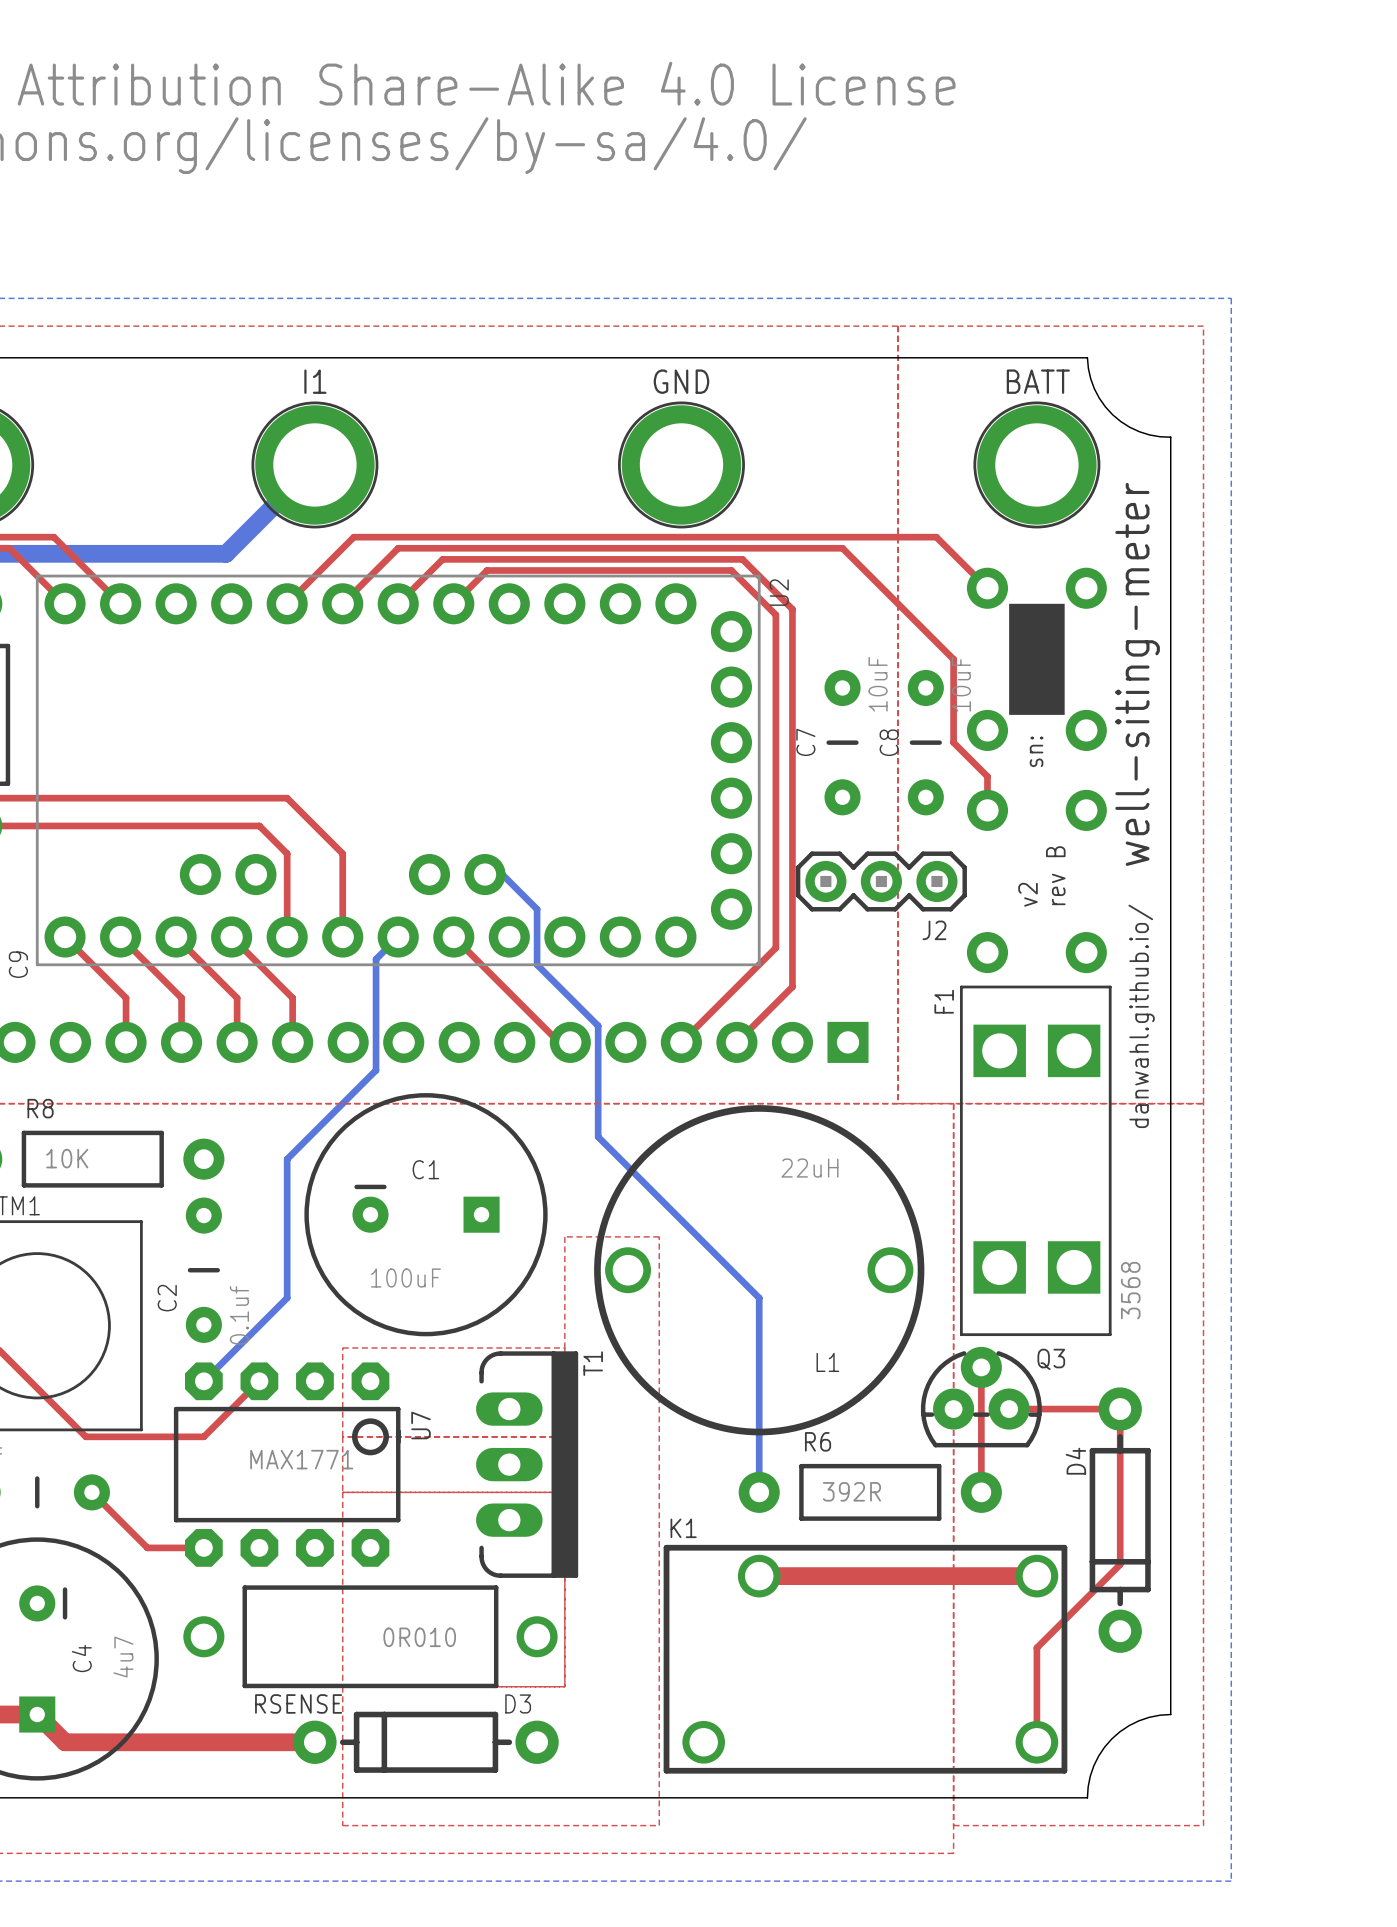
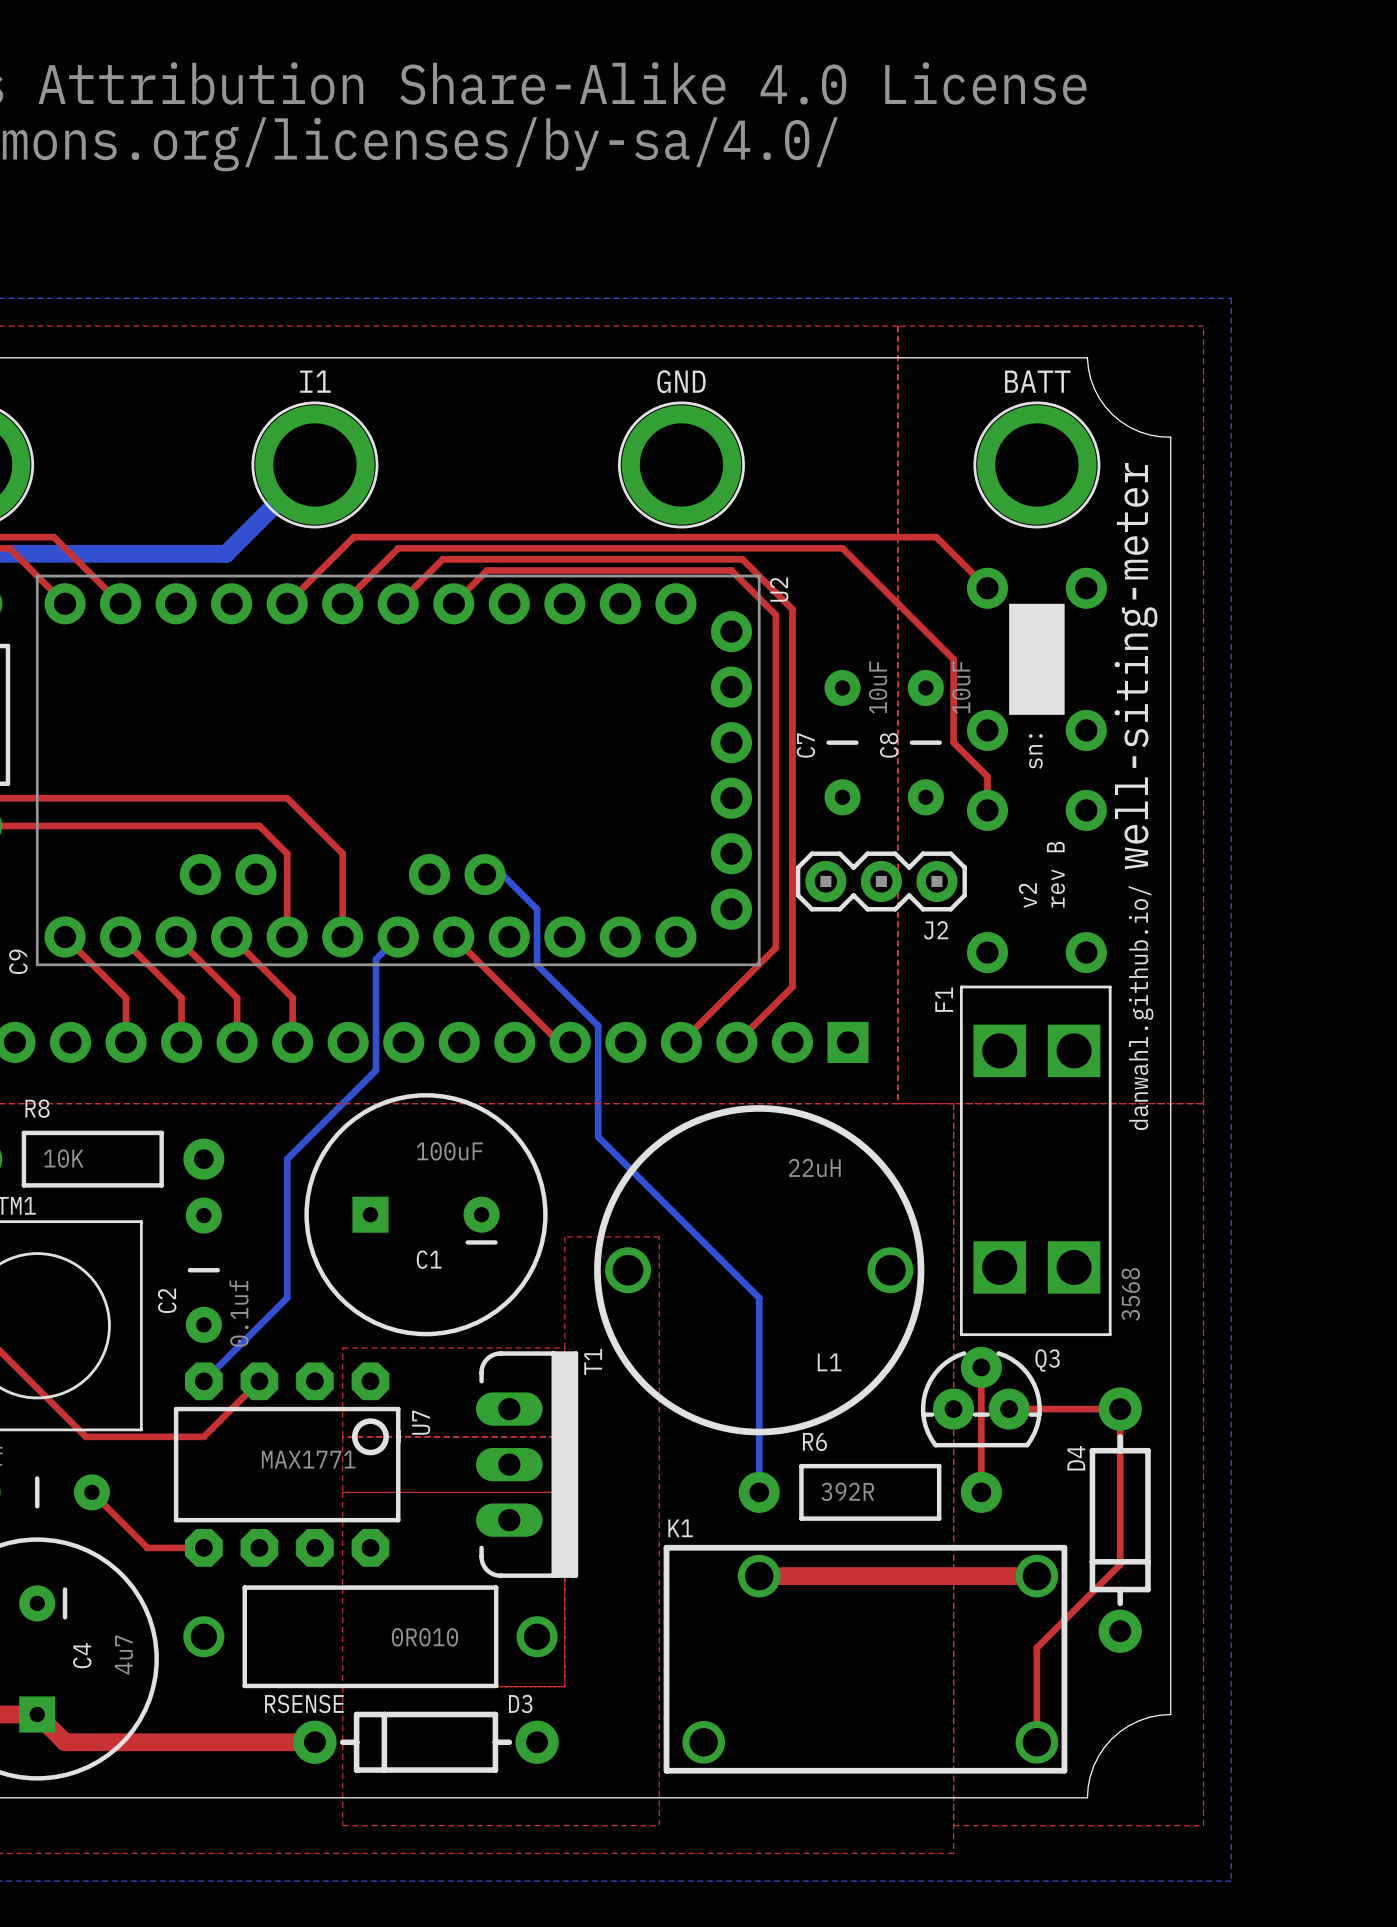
C1 rotation: 0° (426, 1214) -> 180° (426, 1214)

